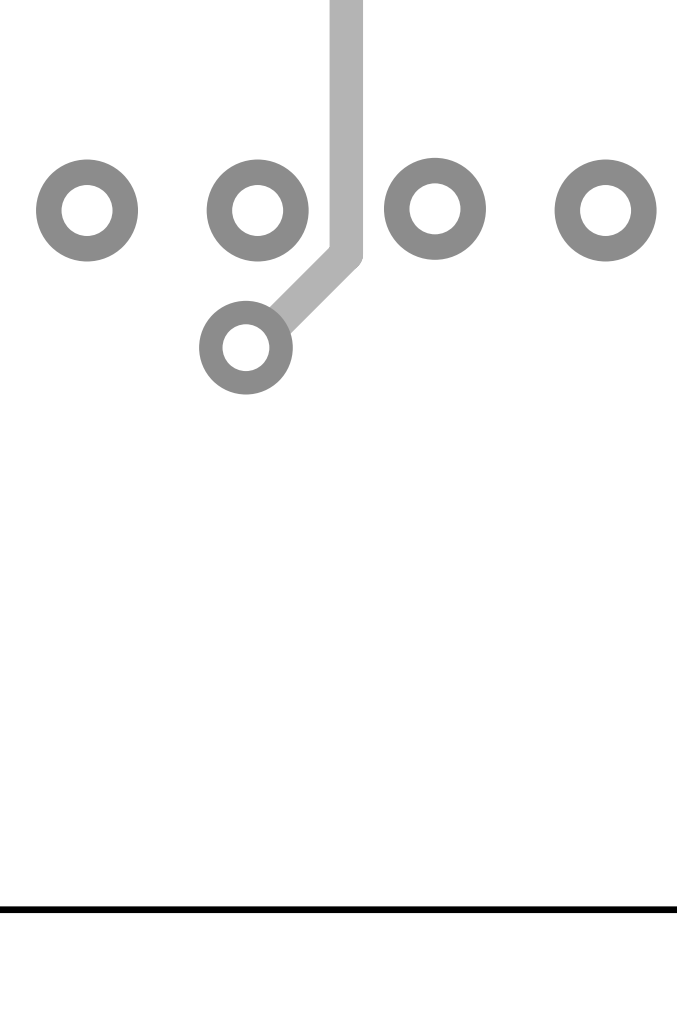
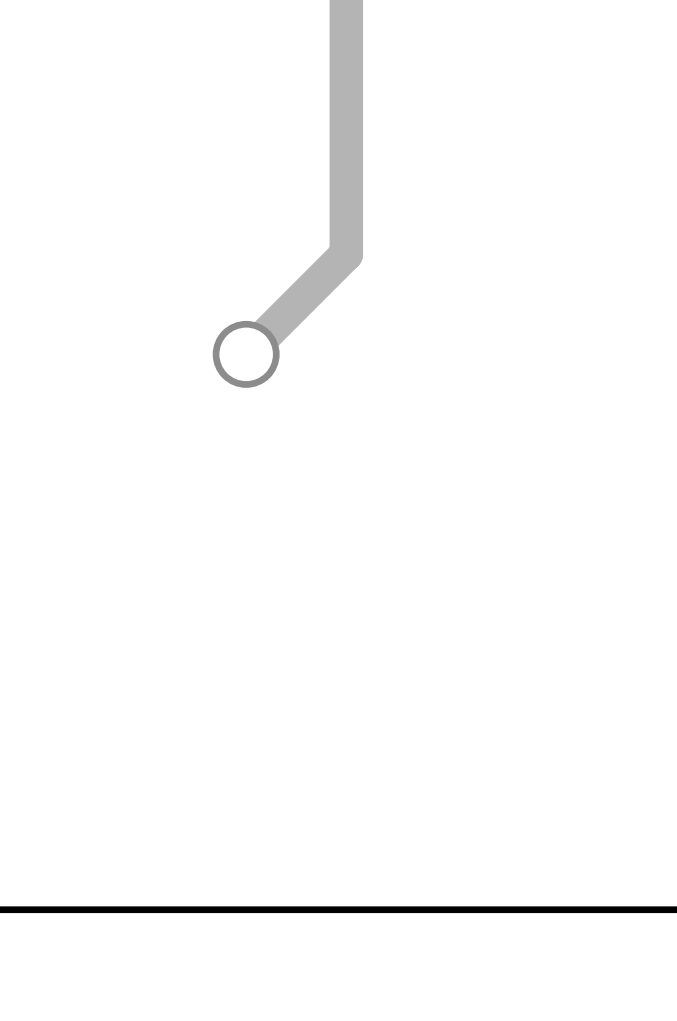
part: (346, 209) -> none
via size: [199, 300, 293, 395] -> [212, 320, 280, 388]

